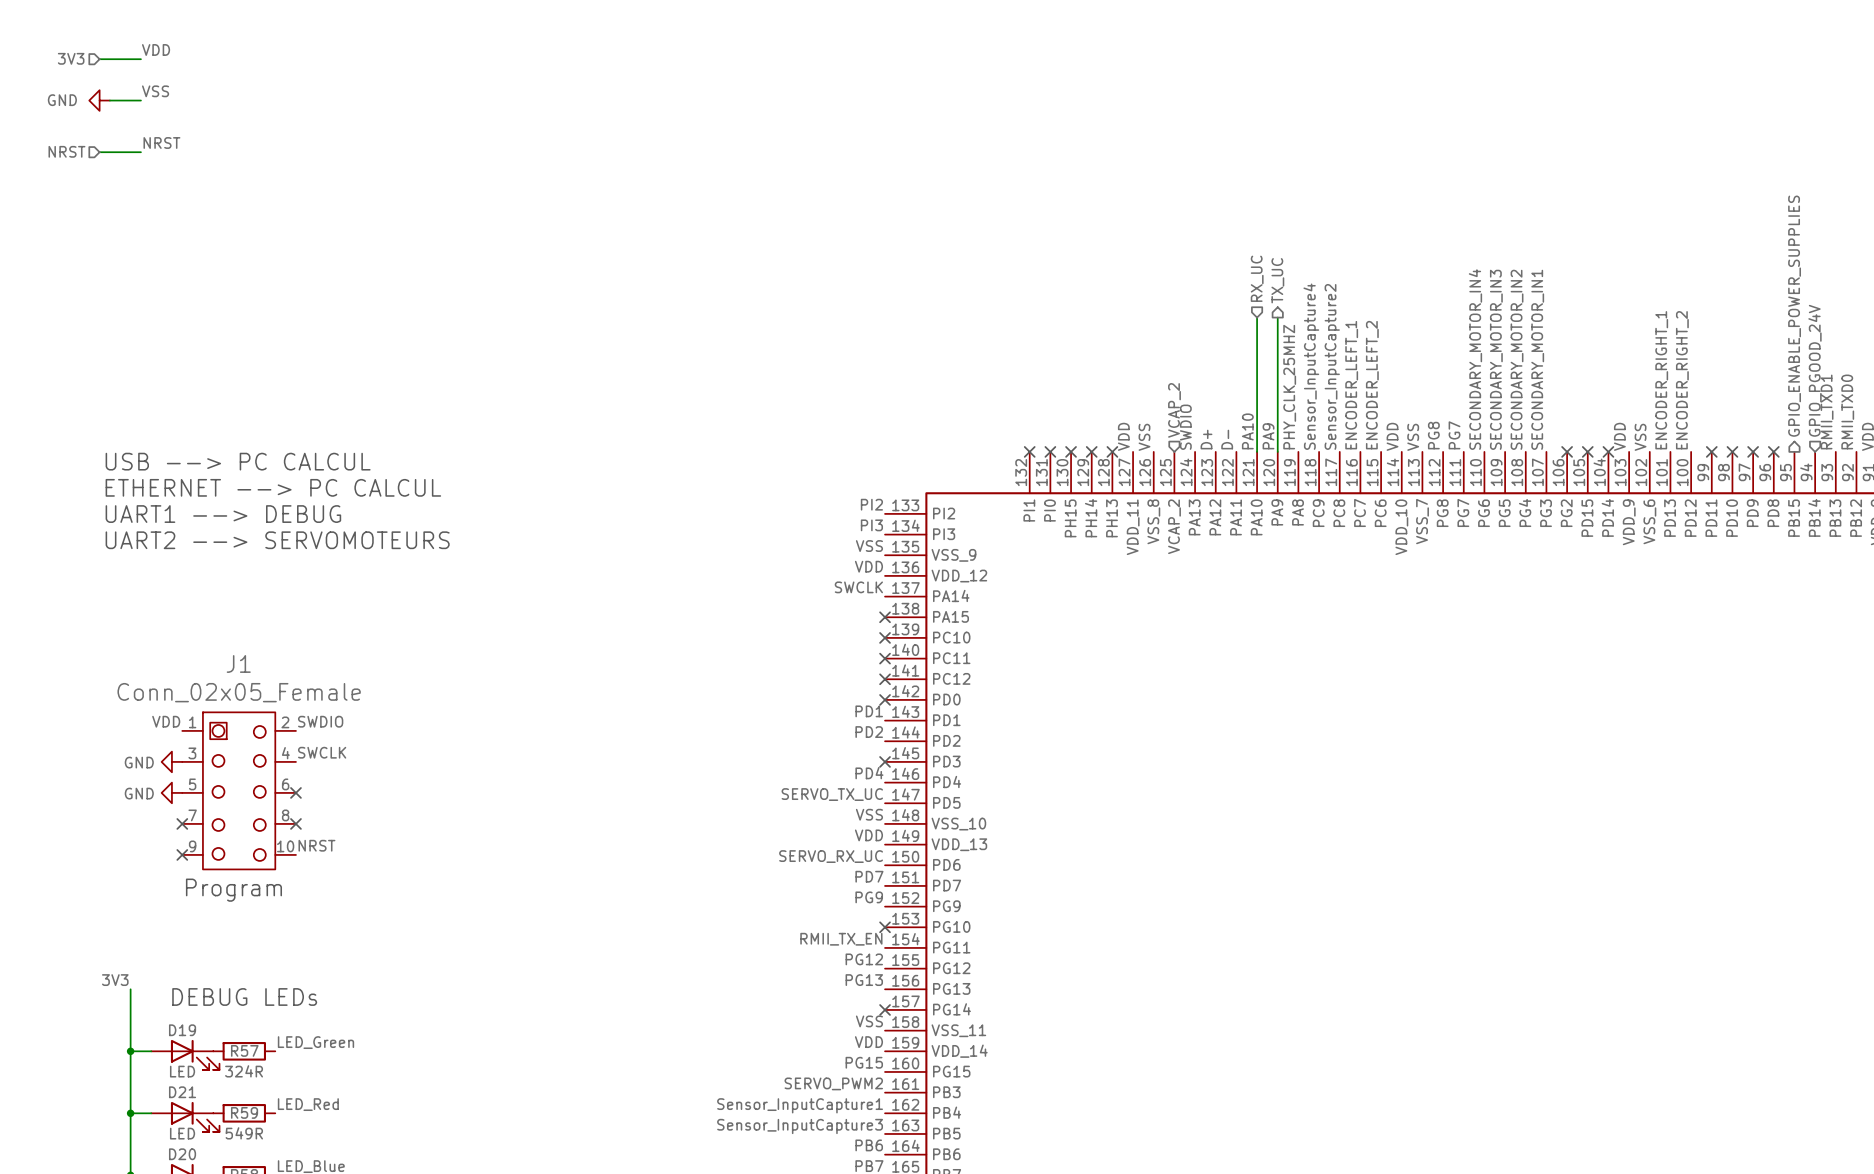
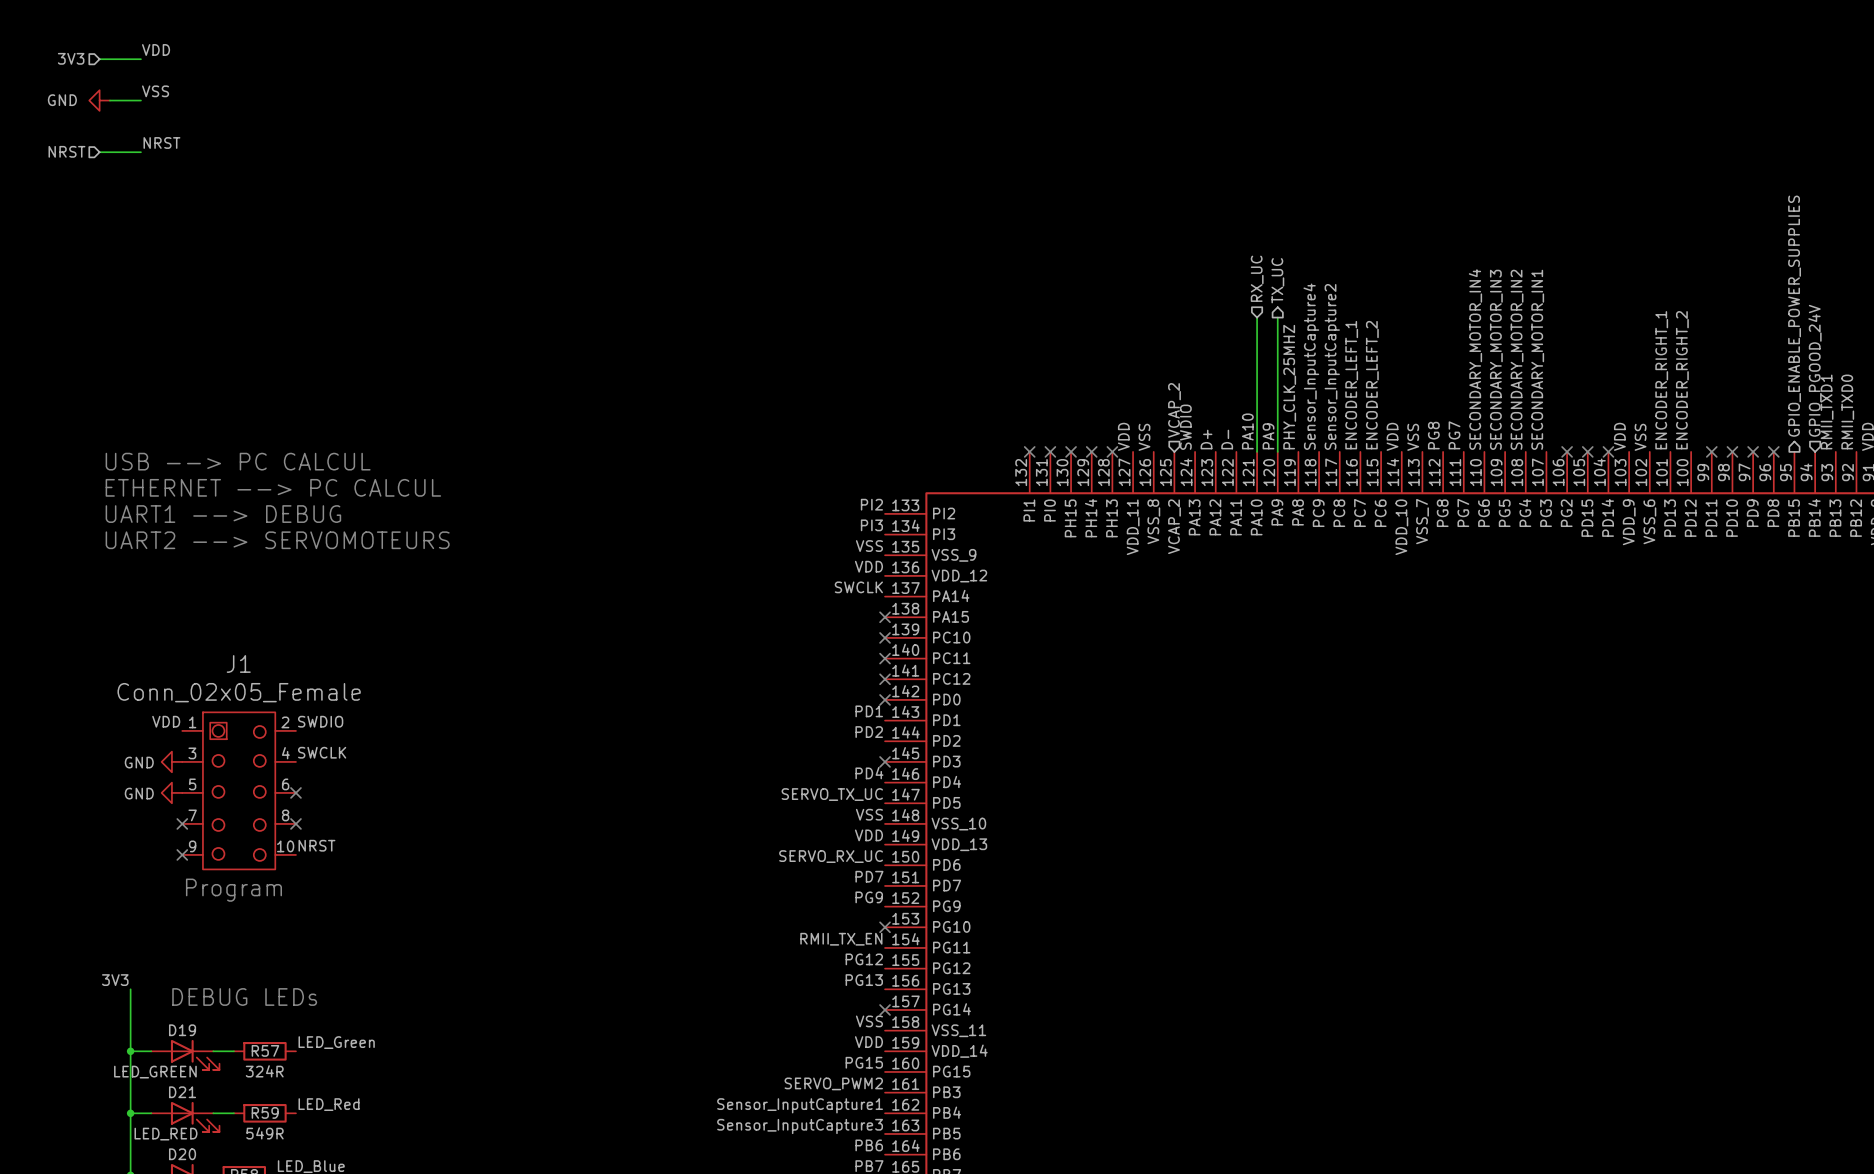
label position: LED_Green (315, 1042) -> LED_Green (336, 1042)
R57 position: (244, 1051) -> (264, 1051)
D19 value: LED (182, 1071) -> LED_GREEN (155, 1072)
label position: LED_Red (308, 1104) -> LED_Red (329, 1104)
R59 position: (244, 1113) -> (264, 1113)
D21 value: LED (182, 1133) -> LED_RED (166, 1134)

